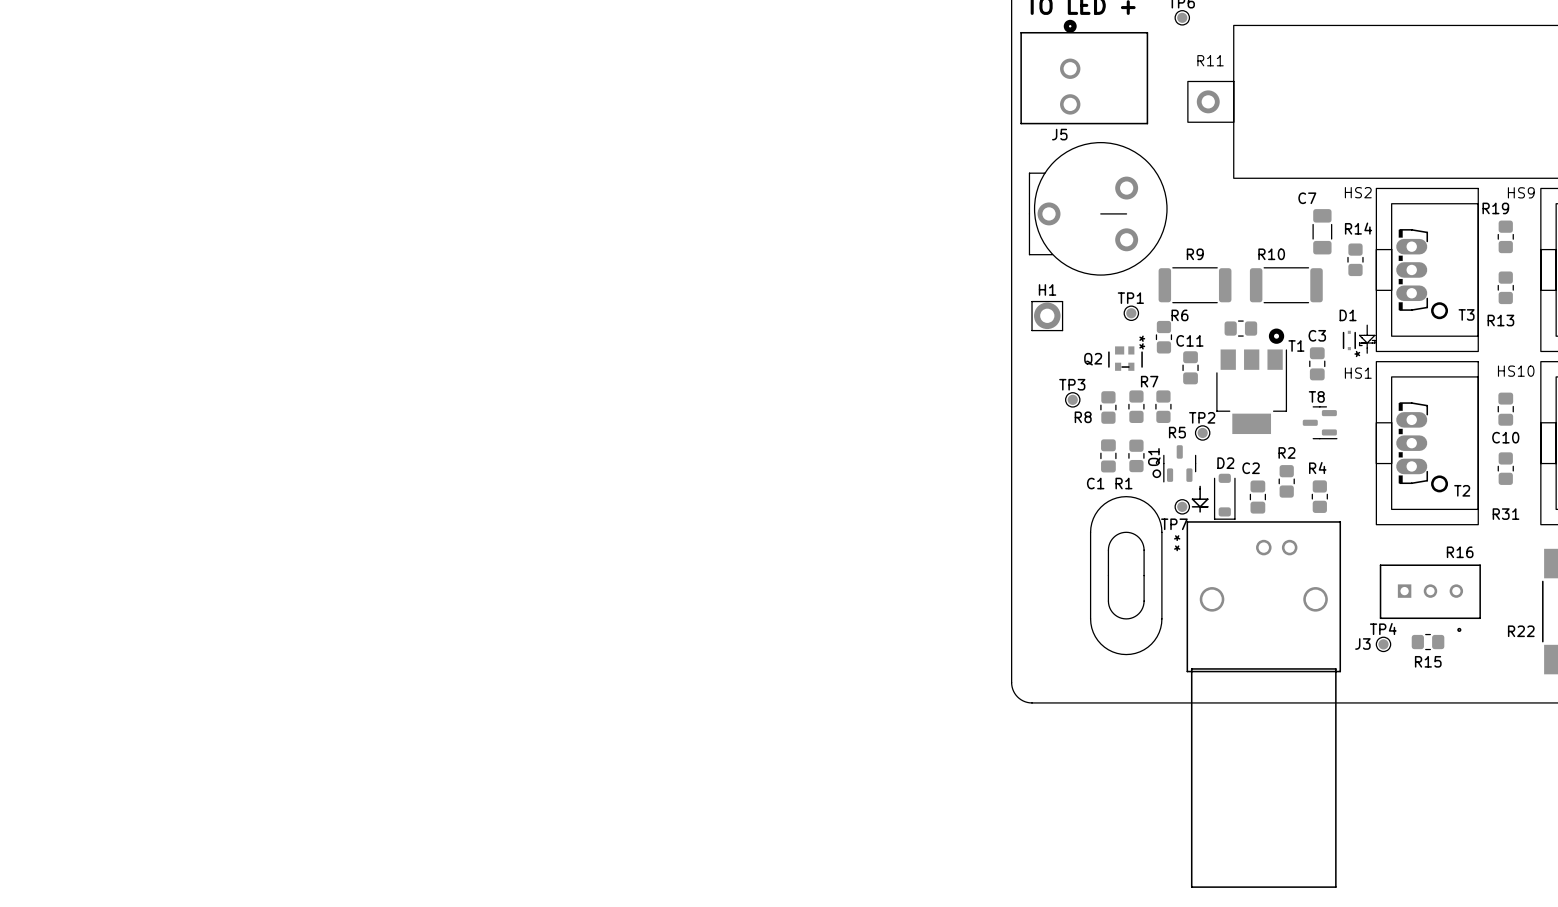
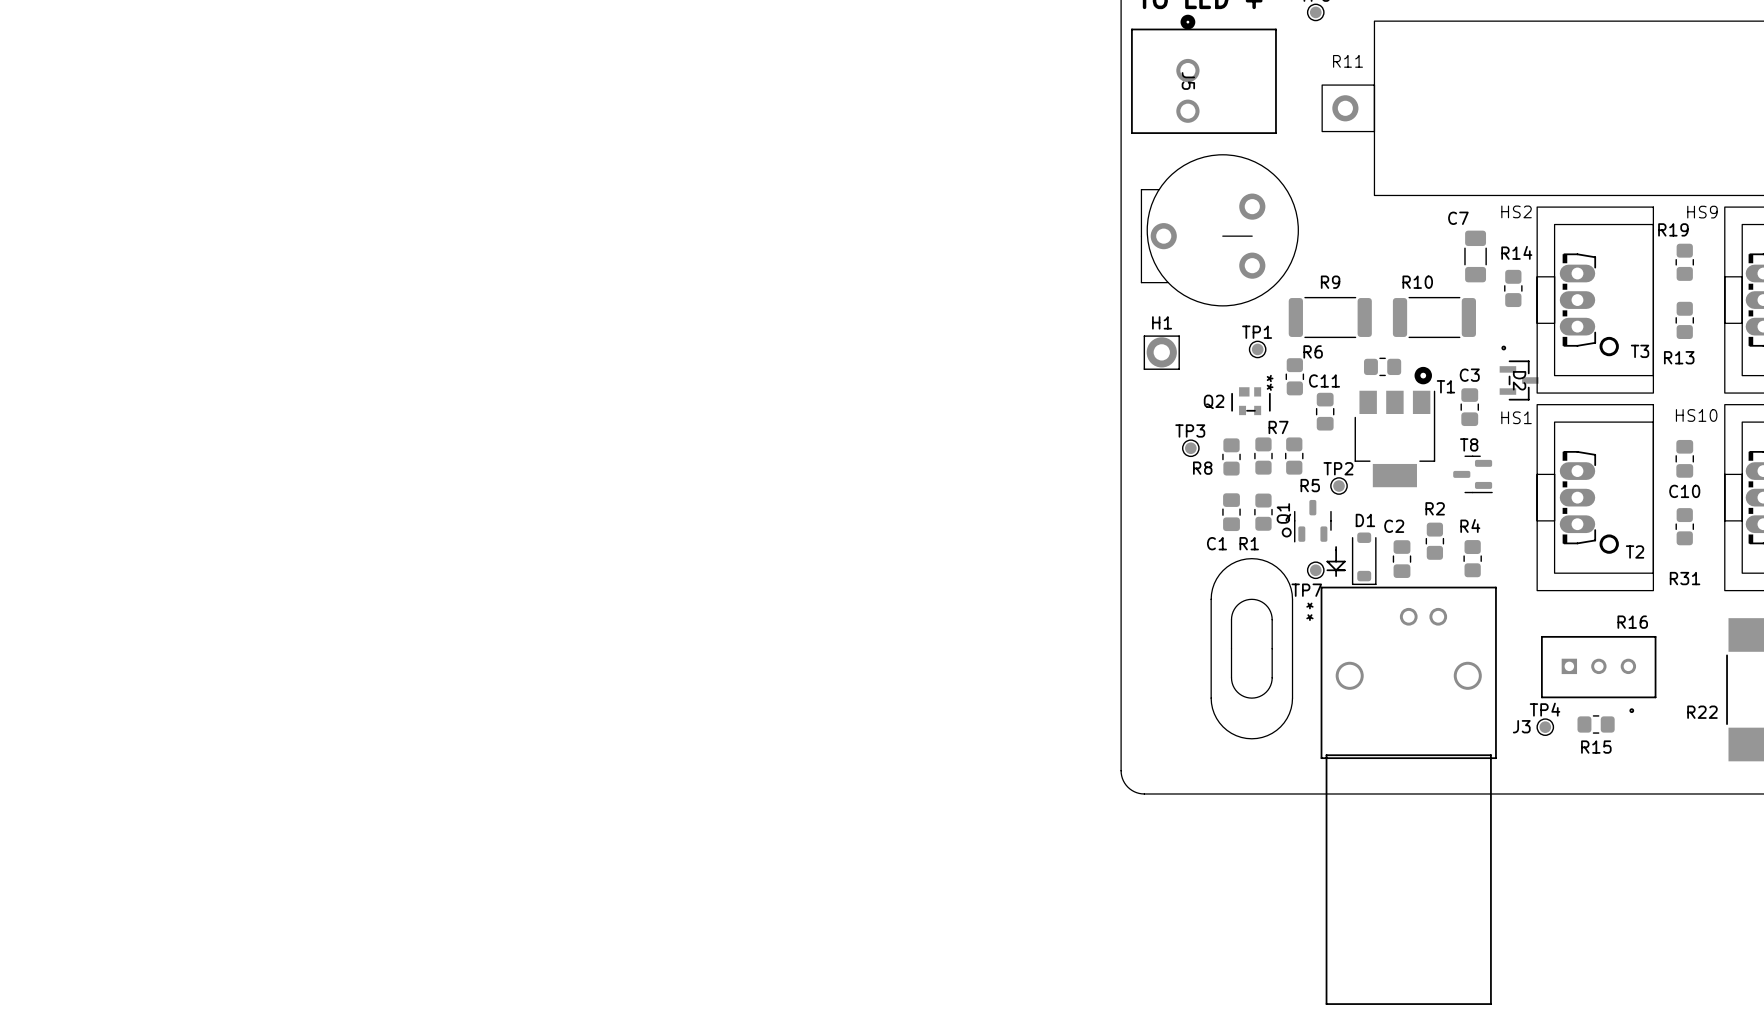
J5 name rotation: 0° (1059, 134) -> 90° clockwise (1188, 81)
J5 name position: J5 (1059, 134) -> J5 (1188, 81)
D2: none -> (1519, 373)
D1: (1359, 339) -> none
D2 name: D2 (1225, 463) -> D1 (1365, 520)

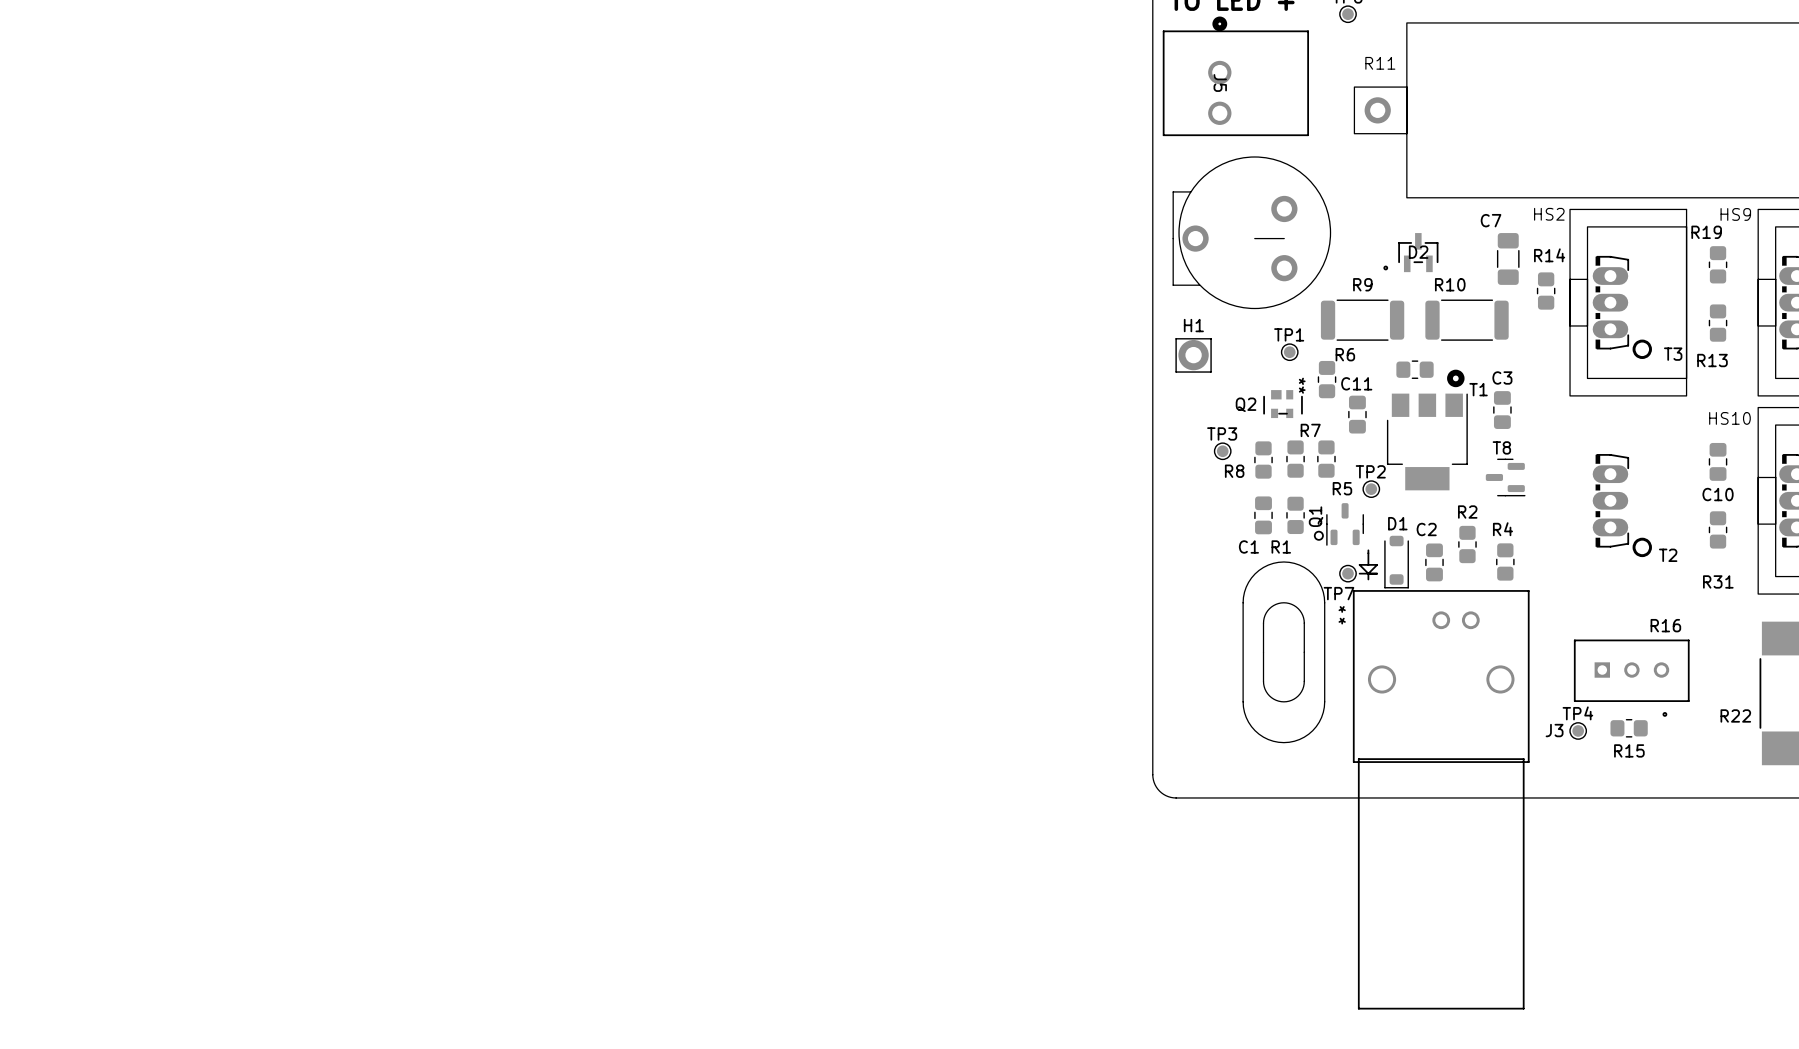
D2 rotation: 0° (1519, 373) -> 90° counterclockwise (1410, 252)
D2 position: (1519, 373) -> (1410, 252)
HS1: (1595, 497) -> none

